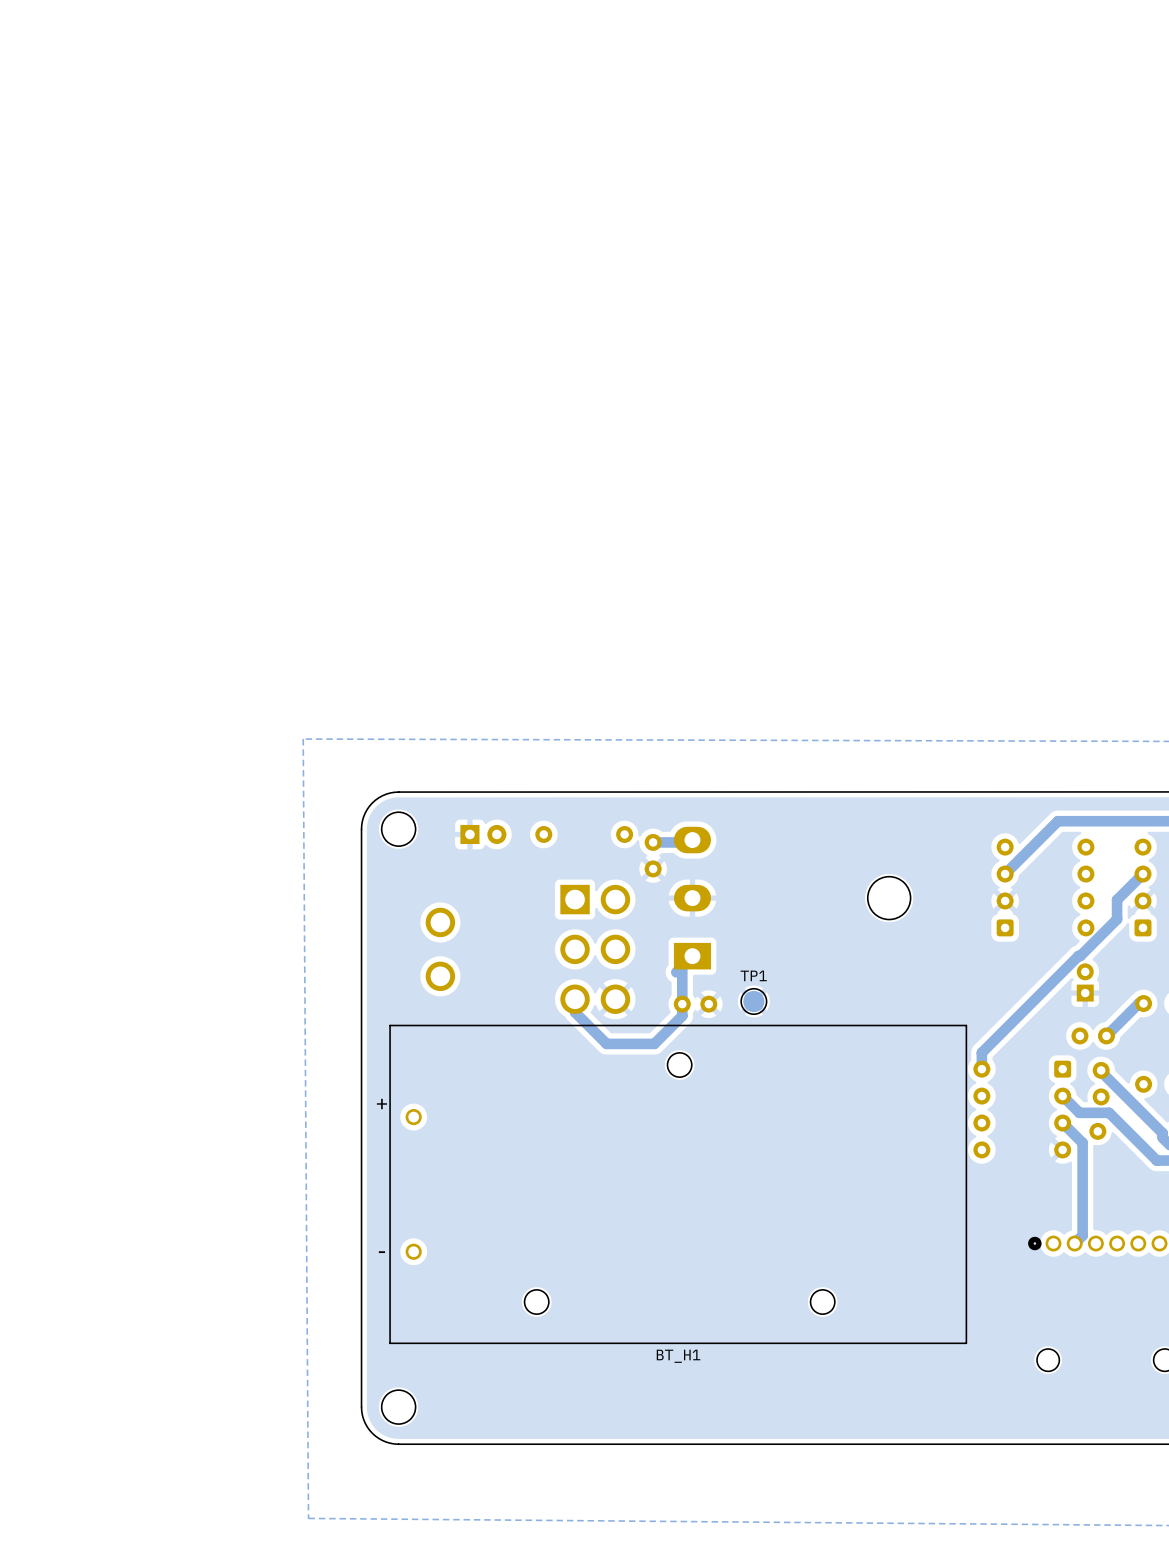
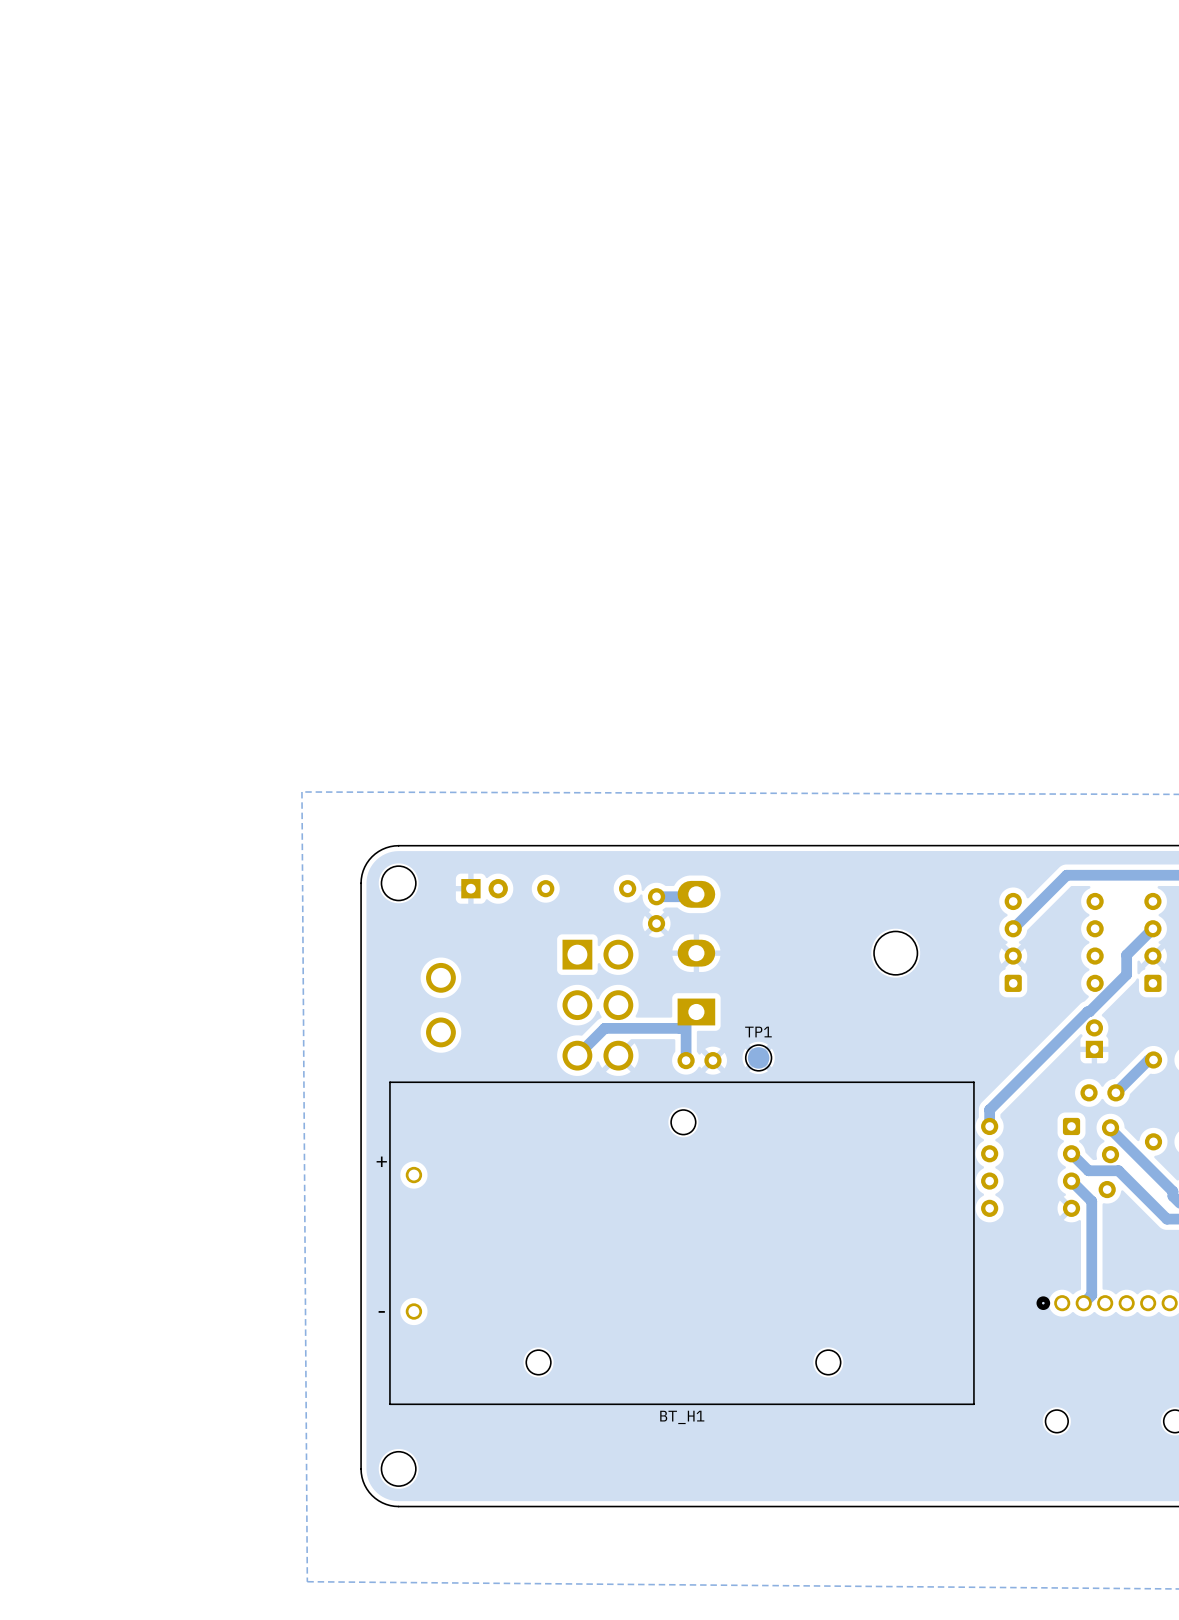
track: (575, 999) (575, 1012) (606, 1043) (654, 1043) (682, 1015) (682, 1004) -> (577, 1055) (604, 1028) (680, 1028)

